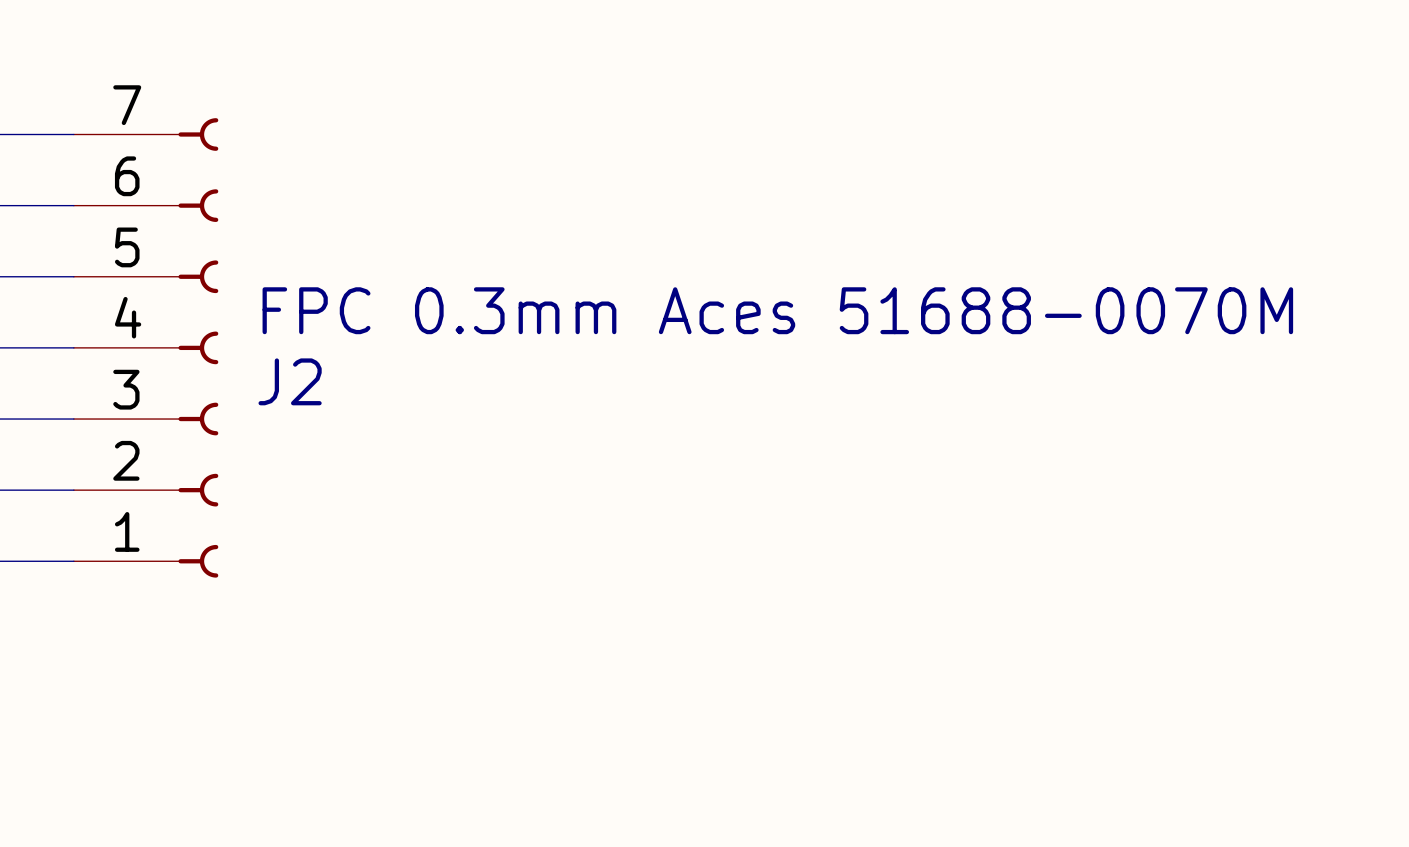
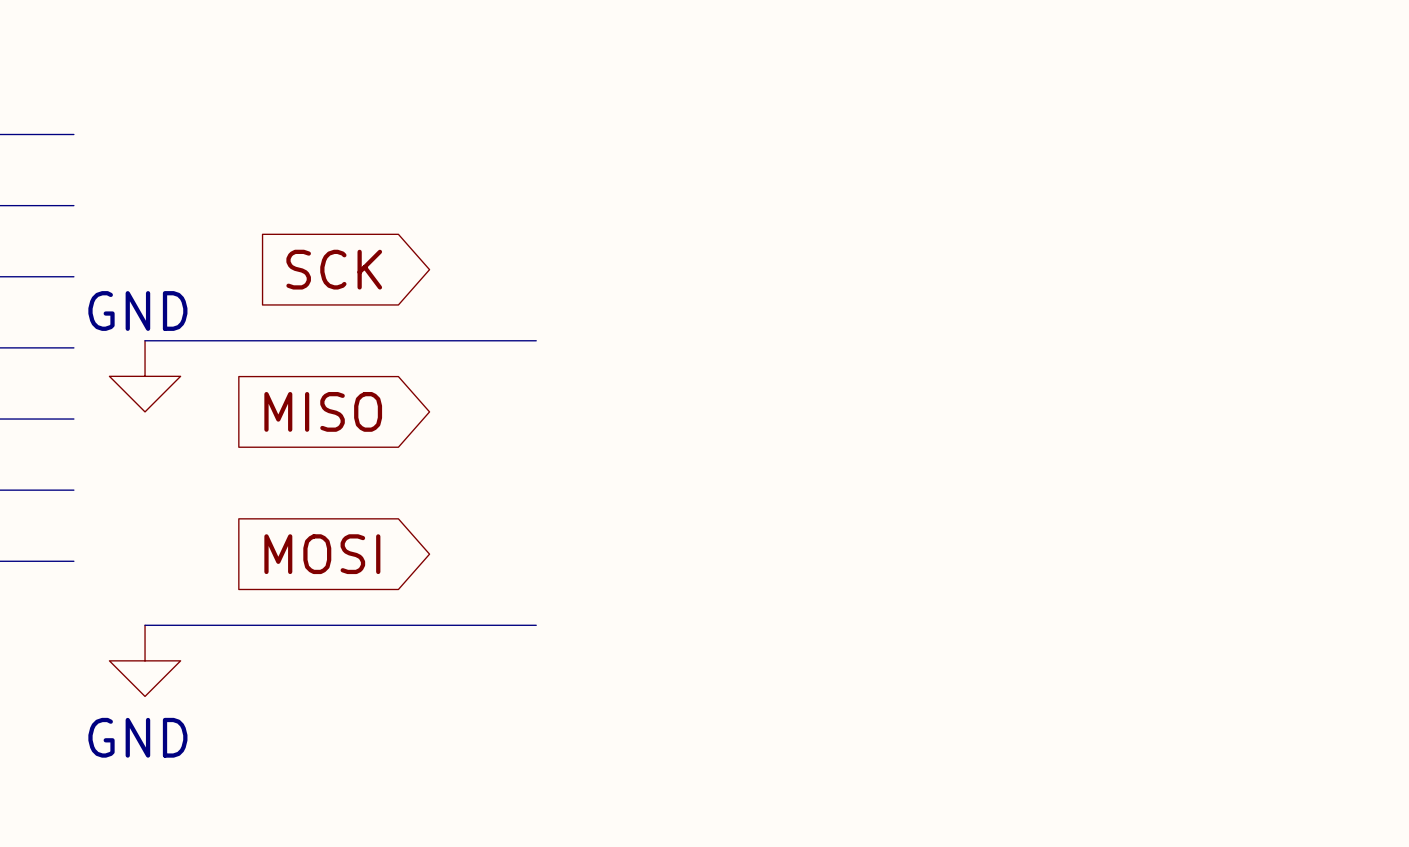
global label: none -> SCK (334, 269)
wire: none -> (145, 340) (536, 340)
J2: FPC 0.3mm Aces 51688-0070M (146, 347) -> none
power symbol: none -> GND (145, 376)
global label: none -> MISO (323, 411)
global label: none -> MOSI (322, 554)
wire: none -> (145, 625) (536, 625)
power symbol: none -> GND (145, 660)

